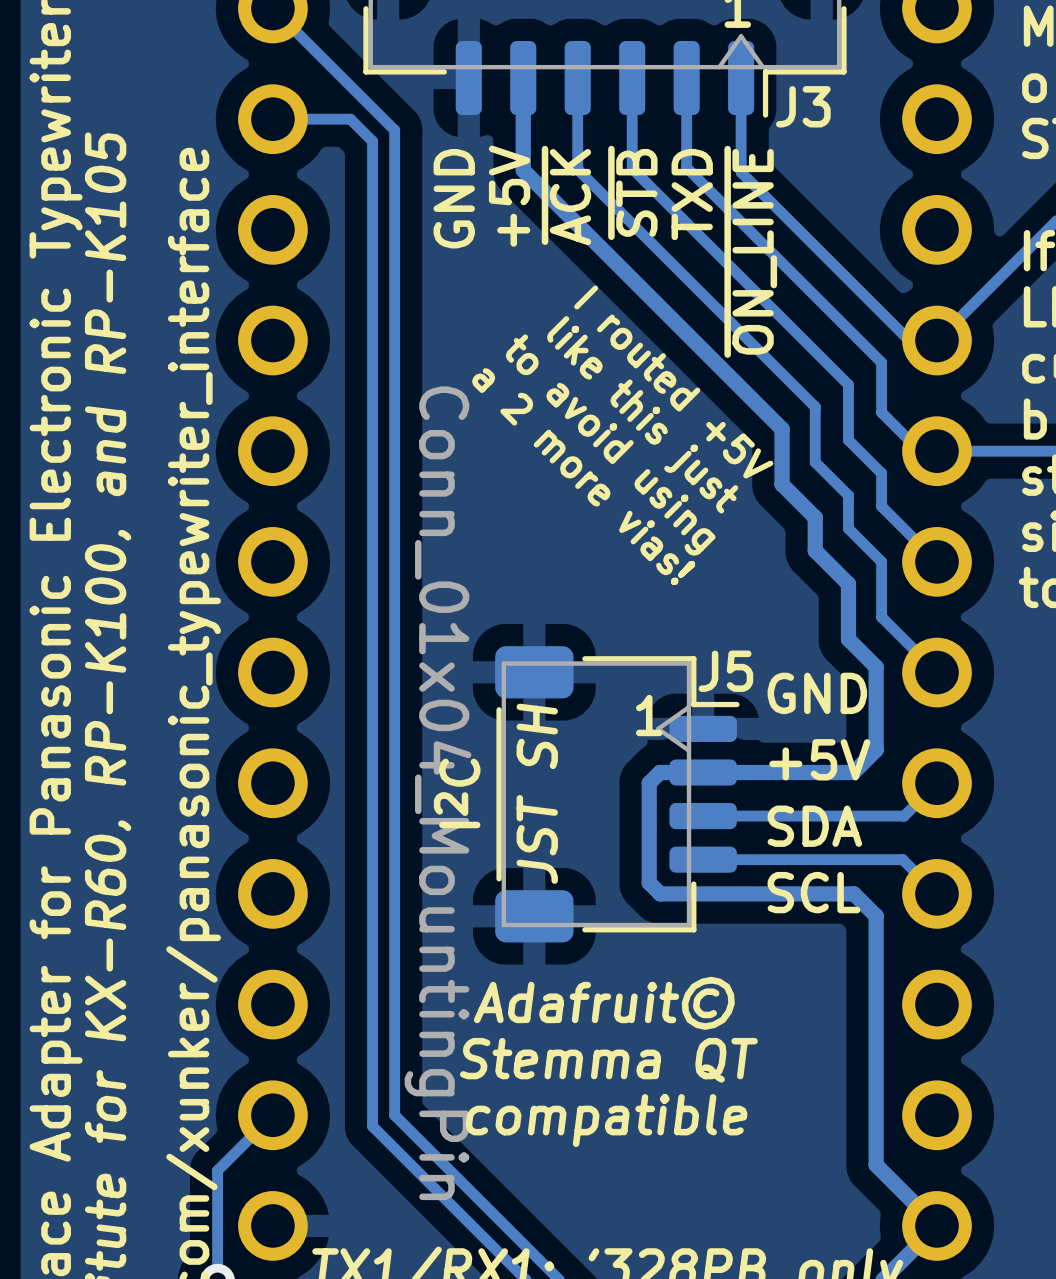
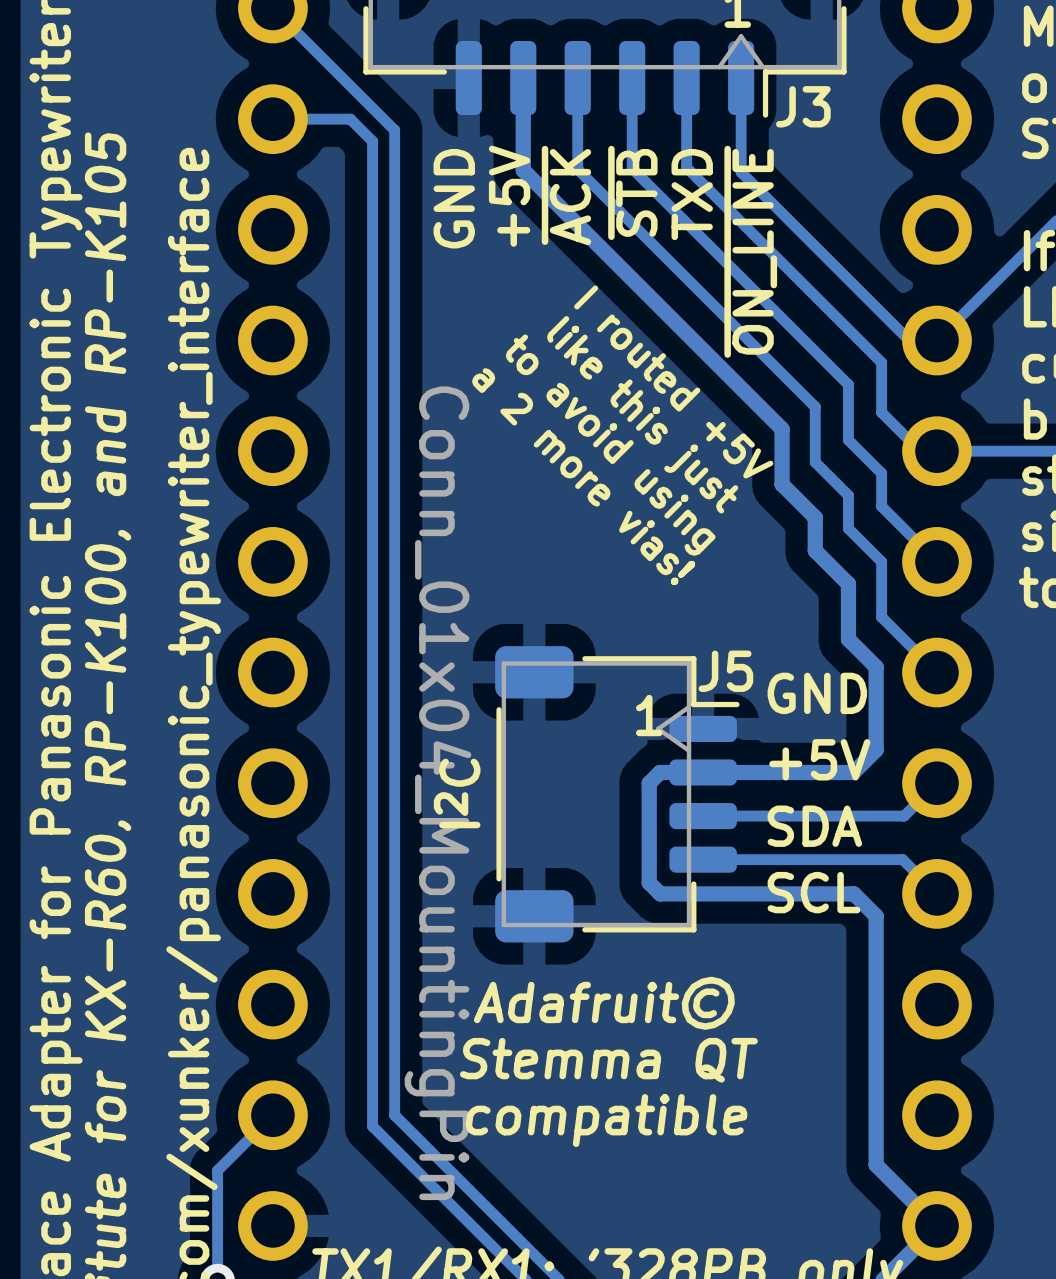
text: JST SH (537, 793) -> none

